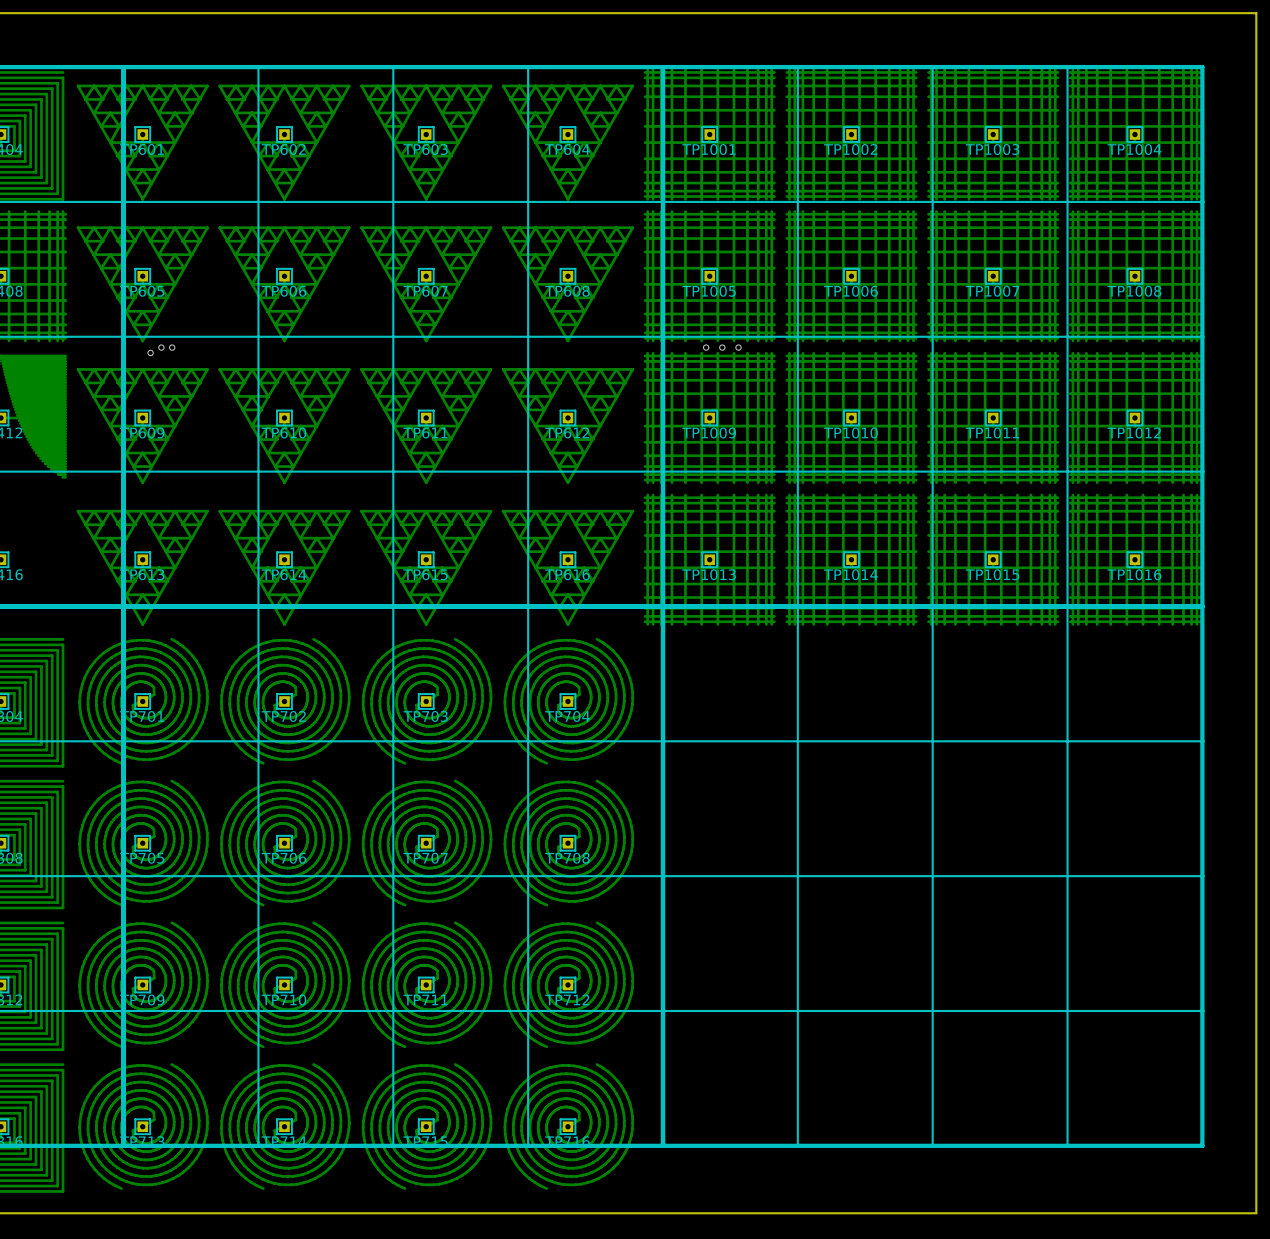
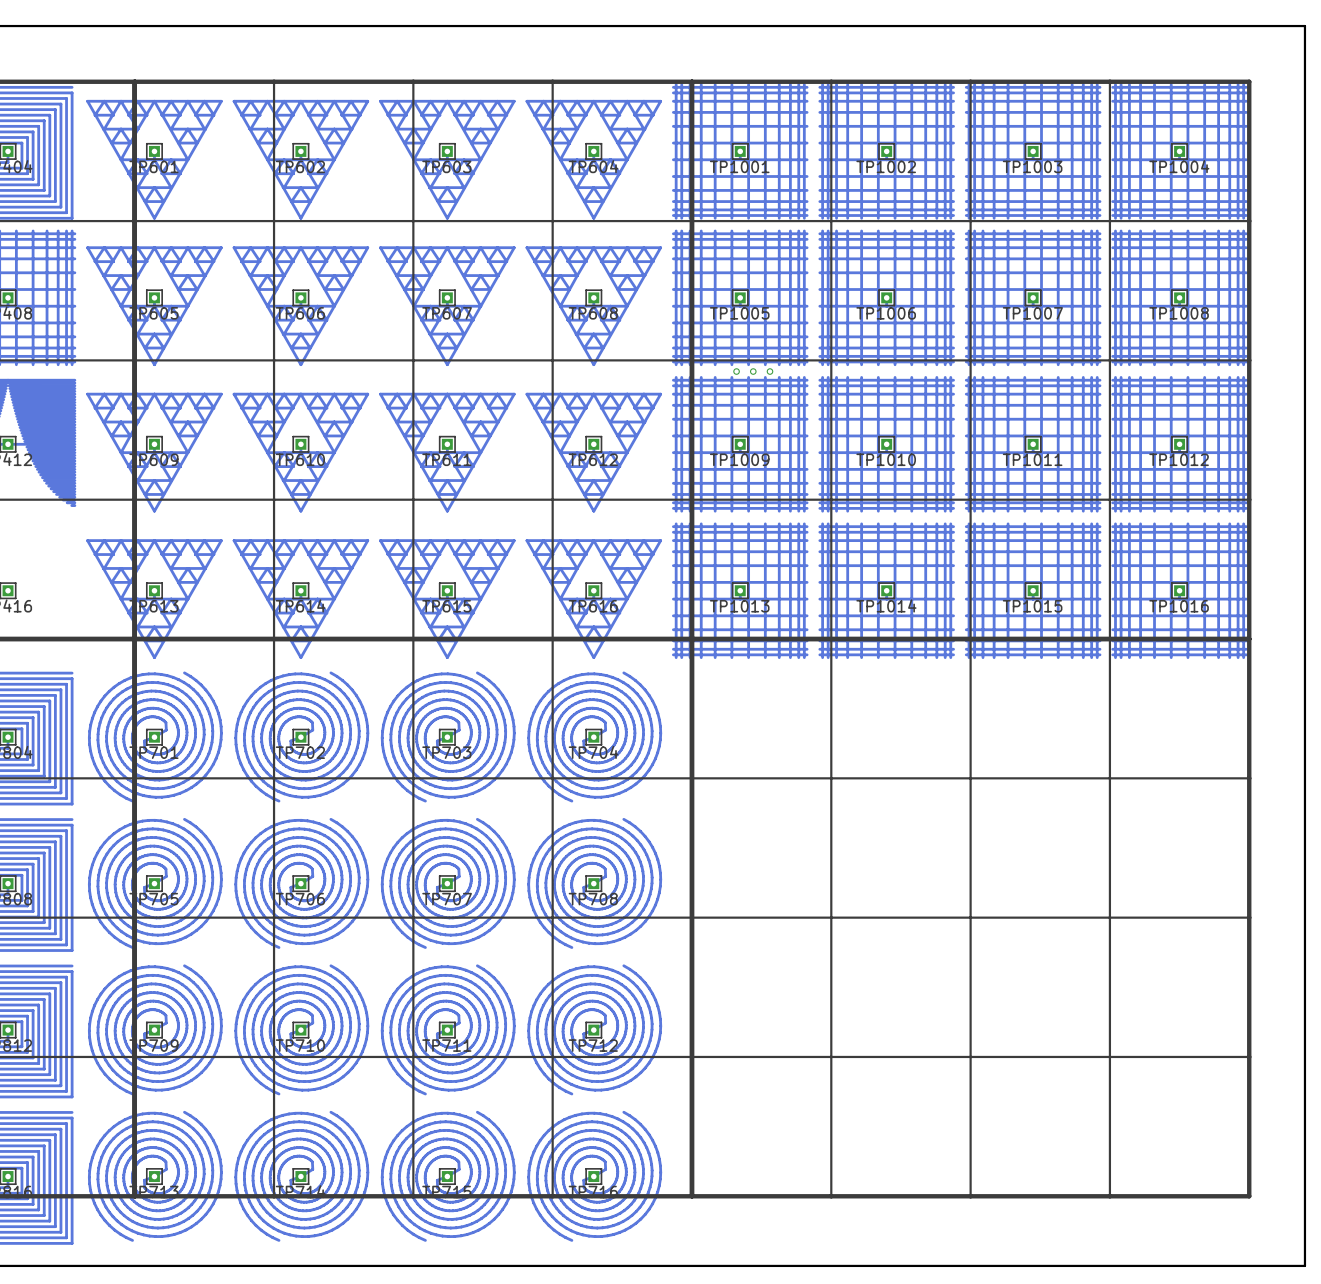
via: (161, 347) -> none
via: (172, 347) -> none
via: (150, 352) -> none

